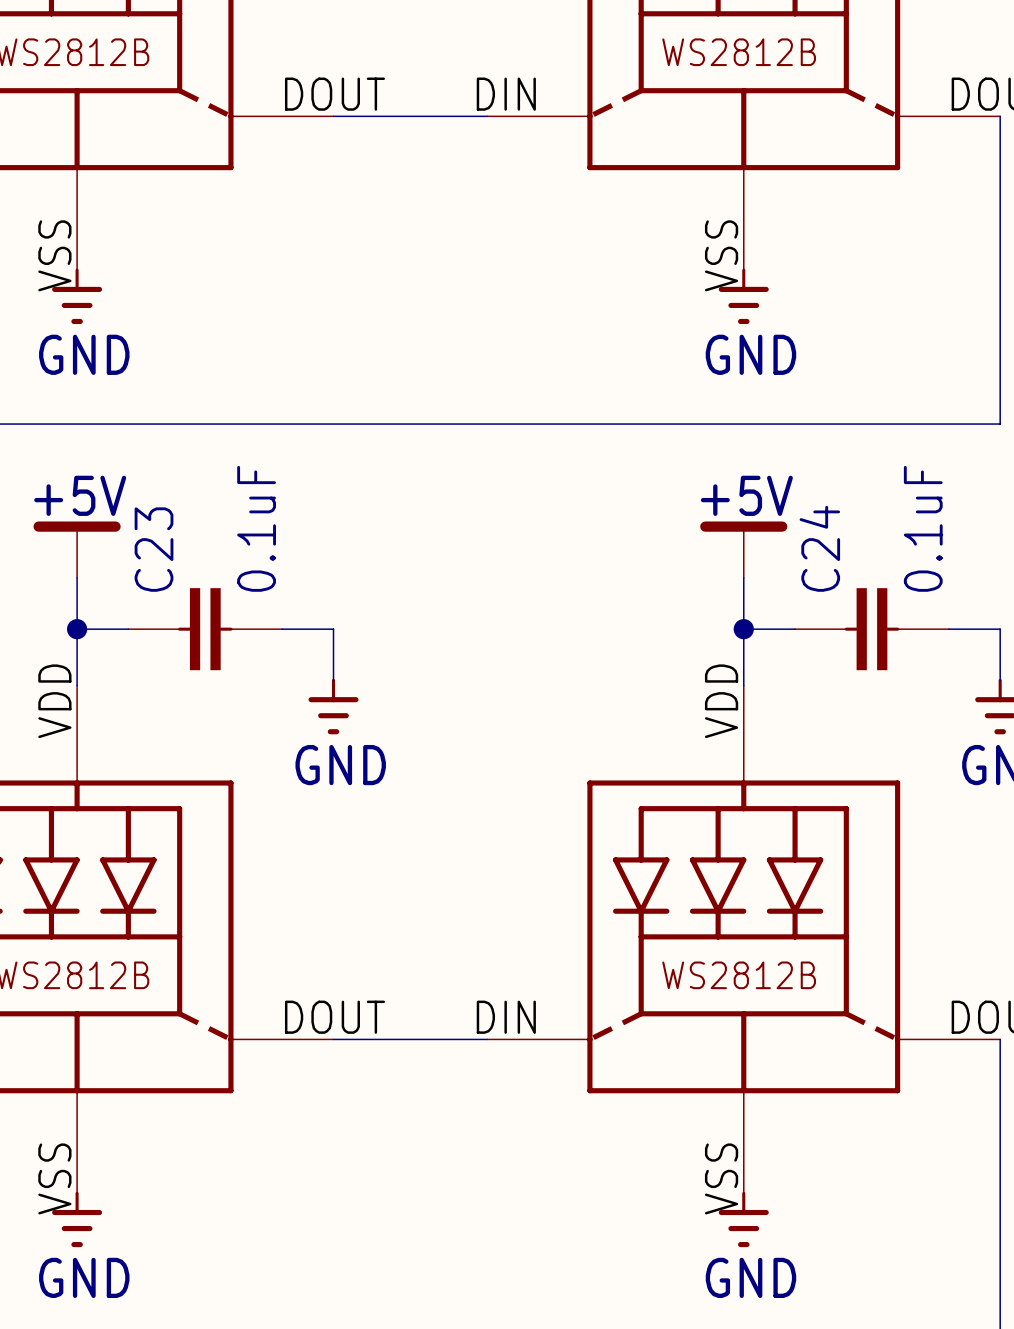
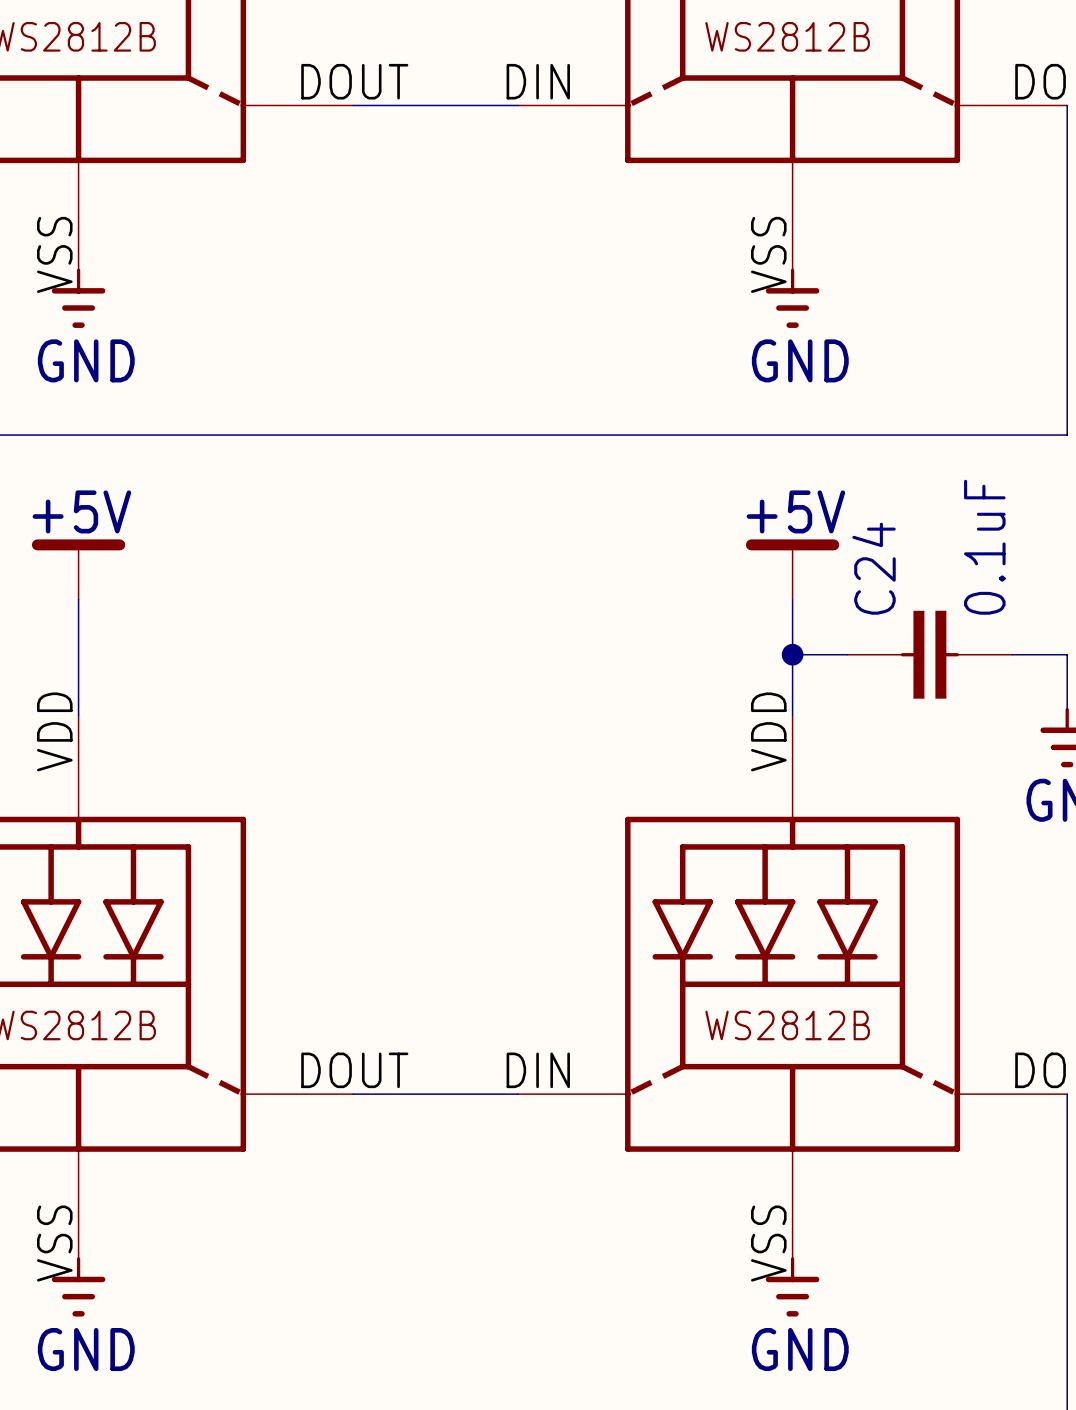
wire: (77, 629) (128, 629) -> none
junction: (77, 629) -> none
C23: 0.1uF (205, 629) -> none
wire: (282, 629) (333, 629) (333, 680) -> none
power symbol: GND (333, 706) -> none

